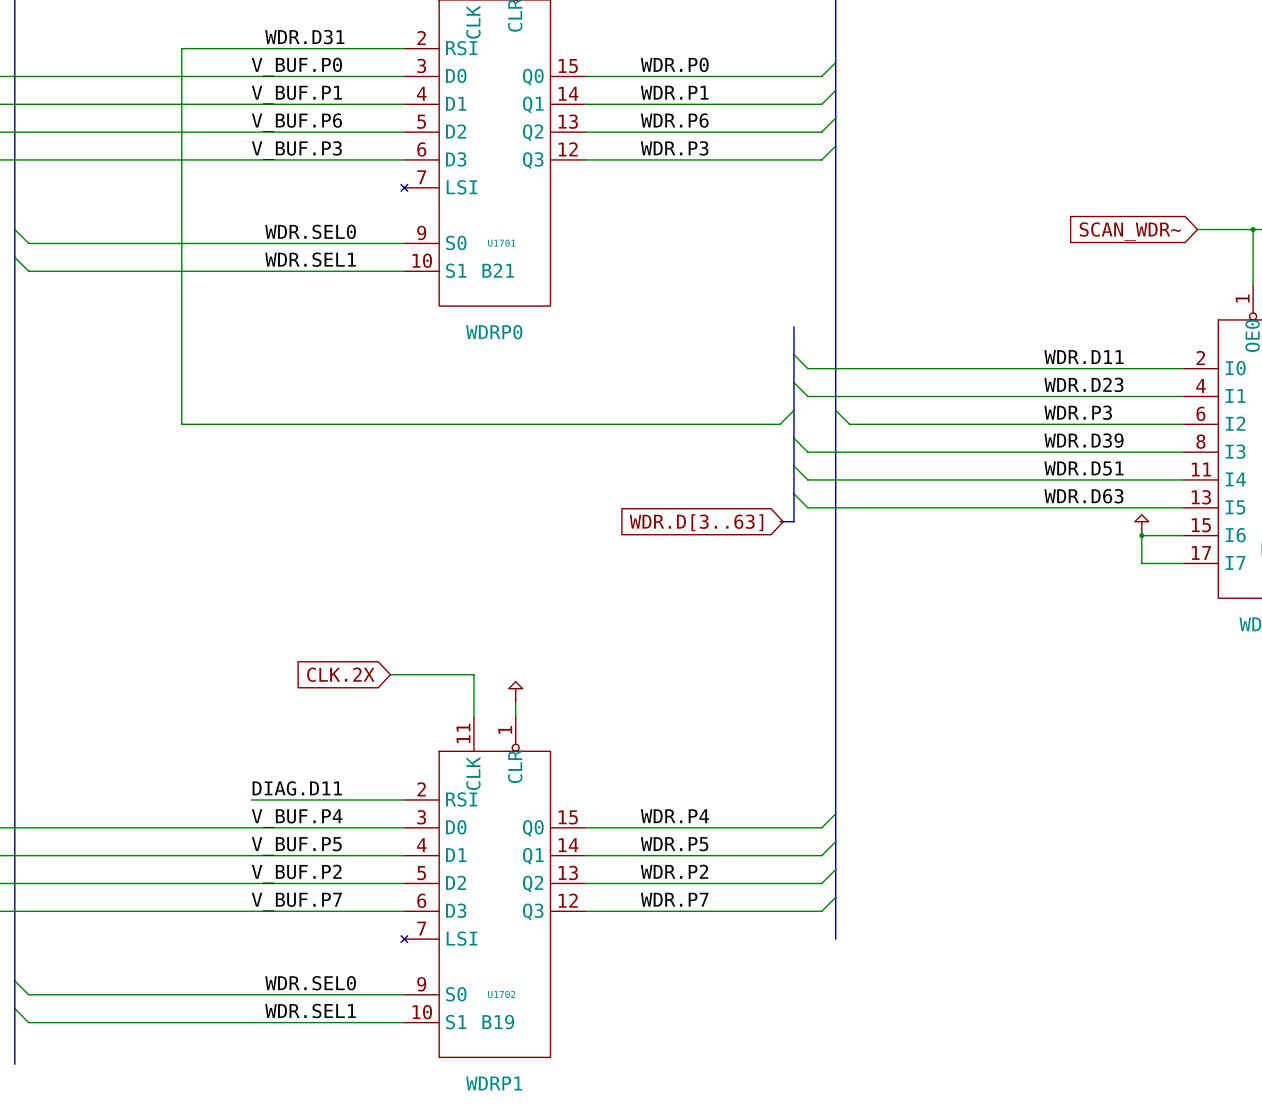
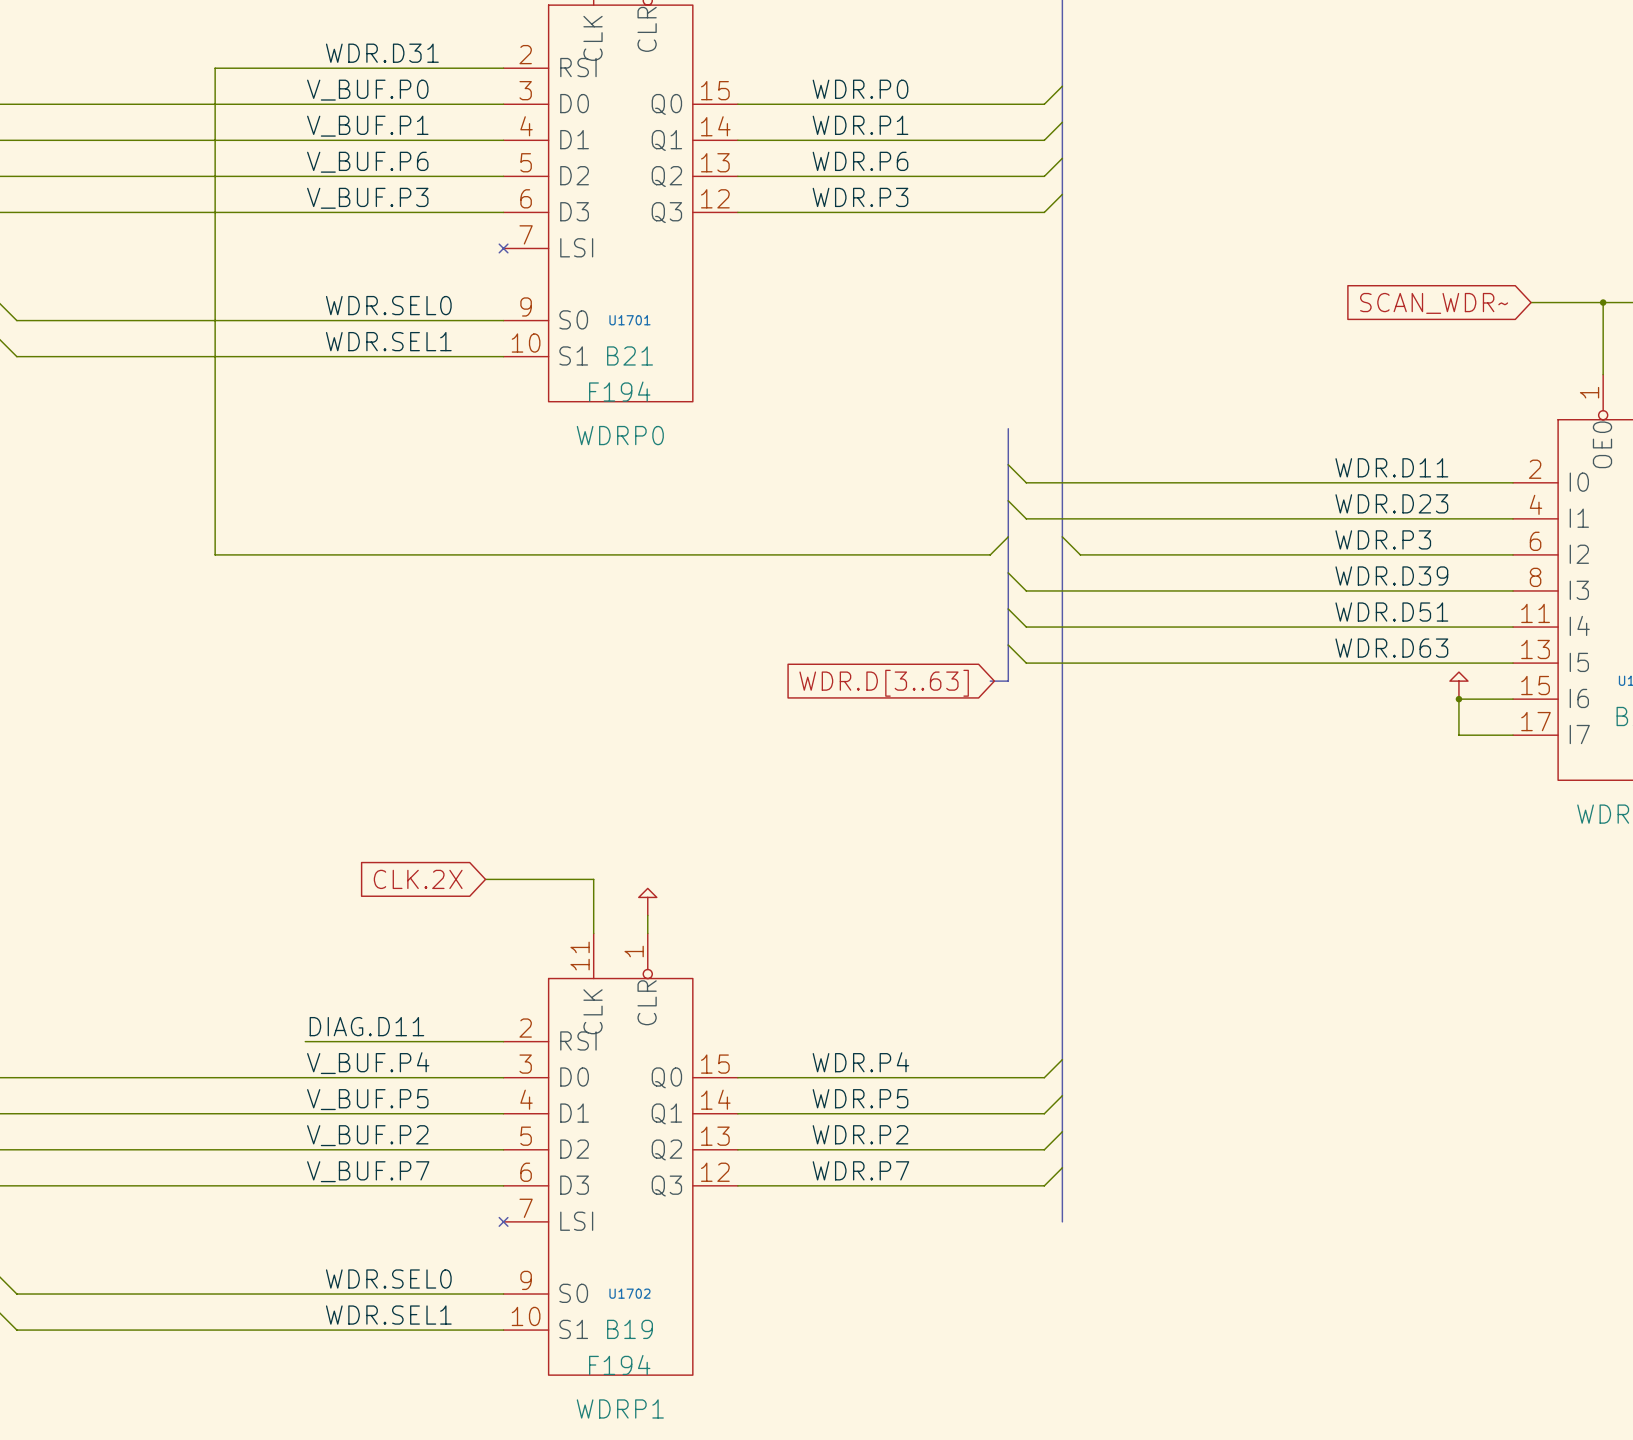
U1701 value: none -> F194 (619, 391)
U1702 value: none -> F194 (619, 1365)

